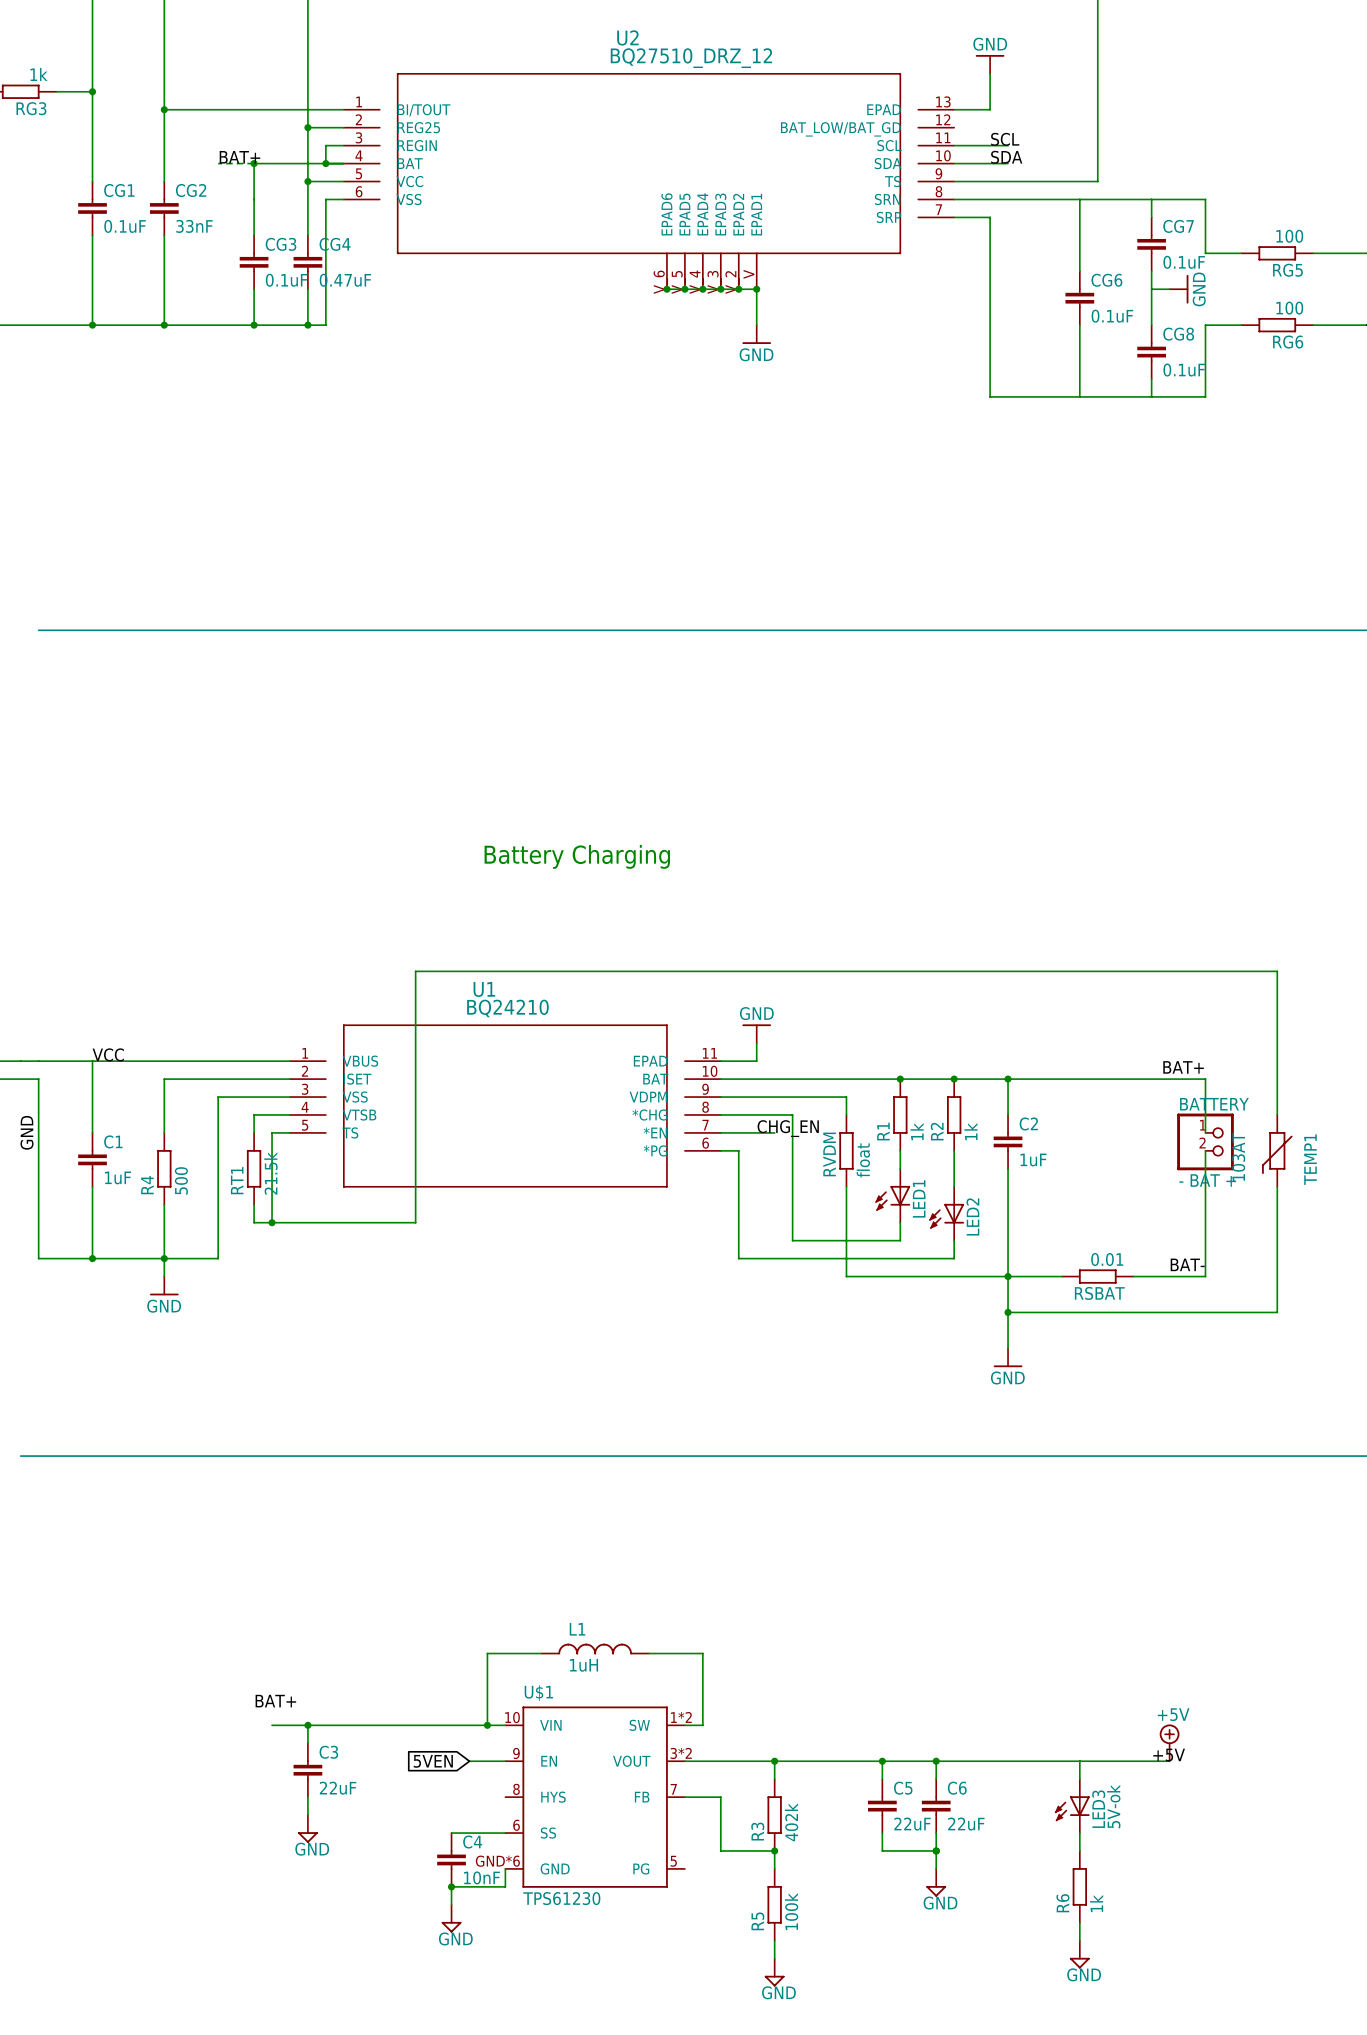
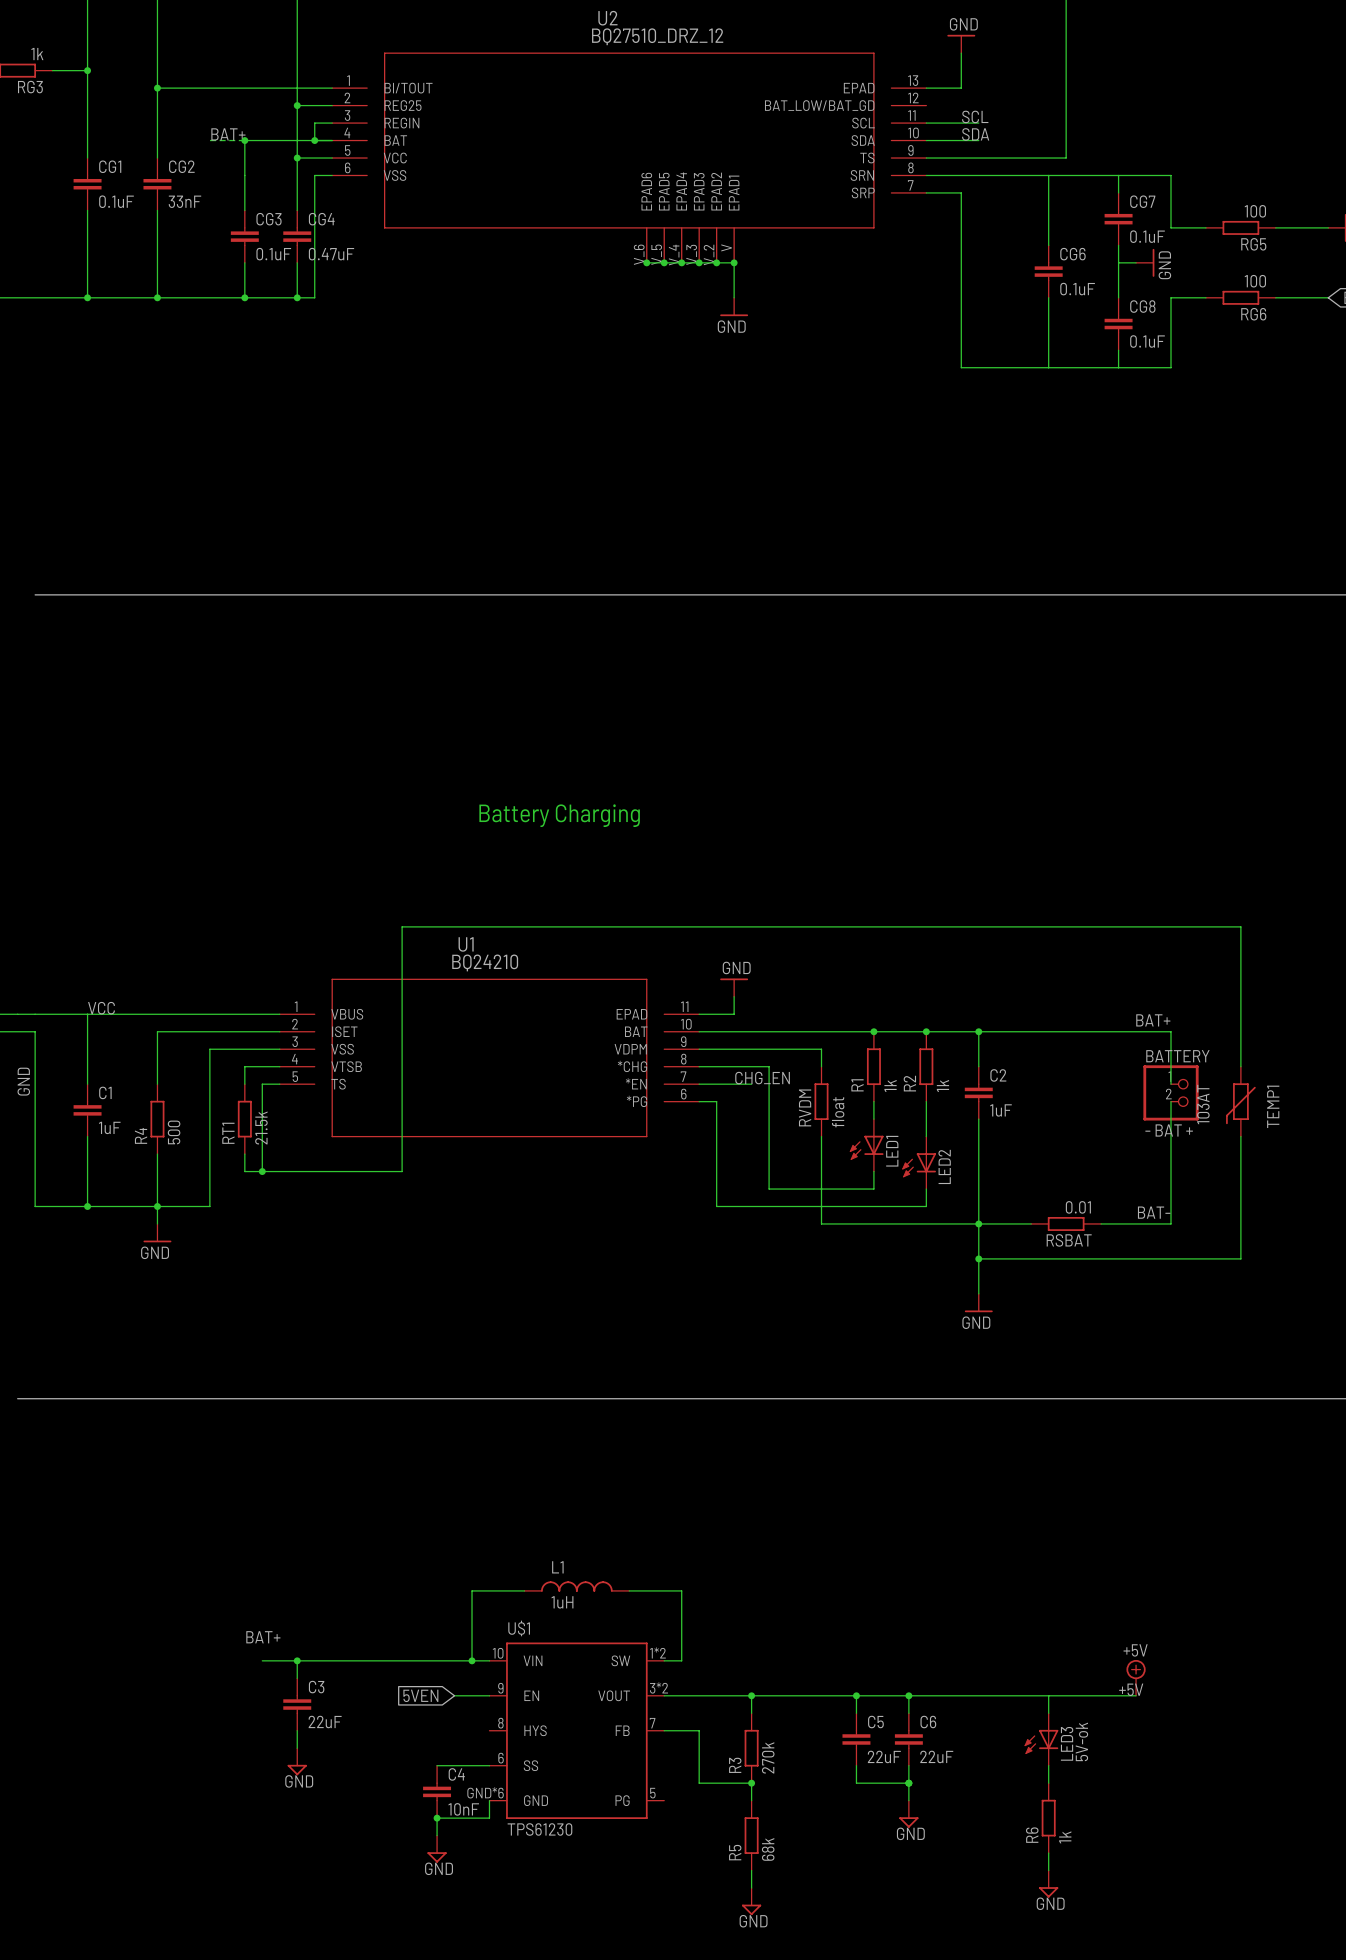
R3 value: 402k (791, 1822) -> 270k (768, 1757)
R5 value: 100k (791, 1911) -> 68k (768, 1849)

